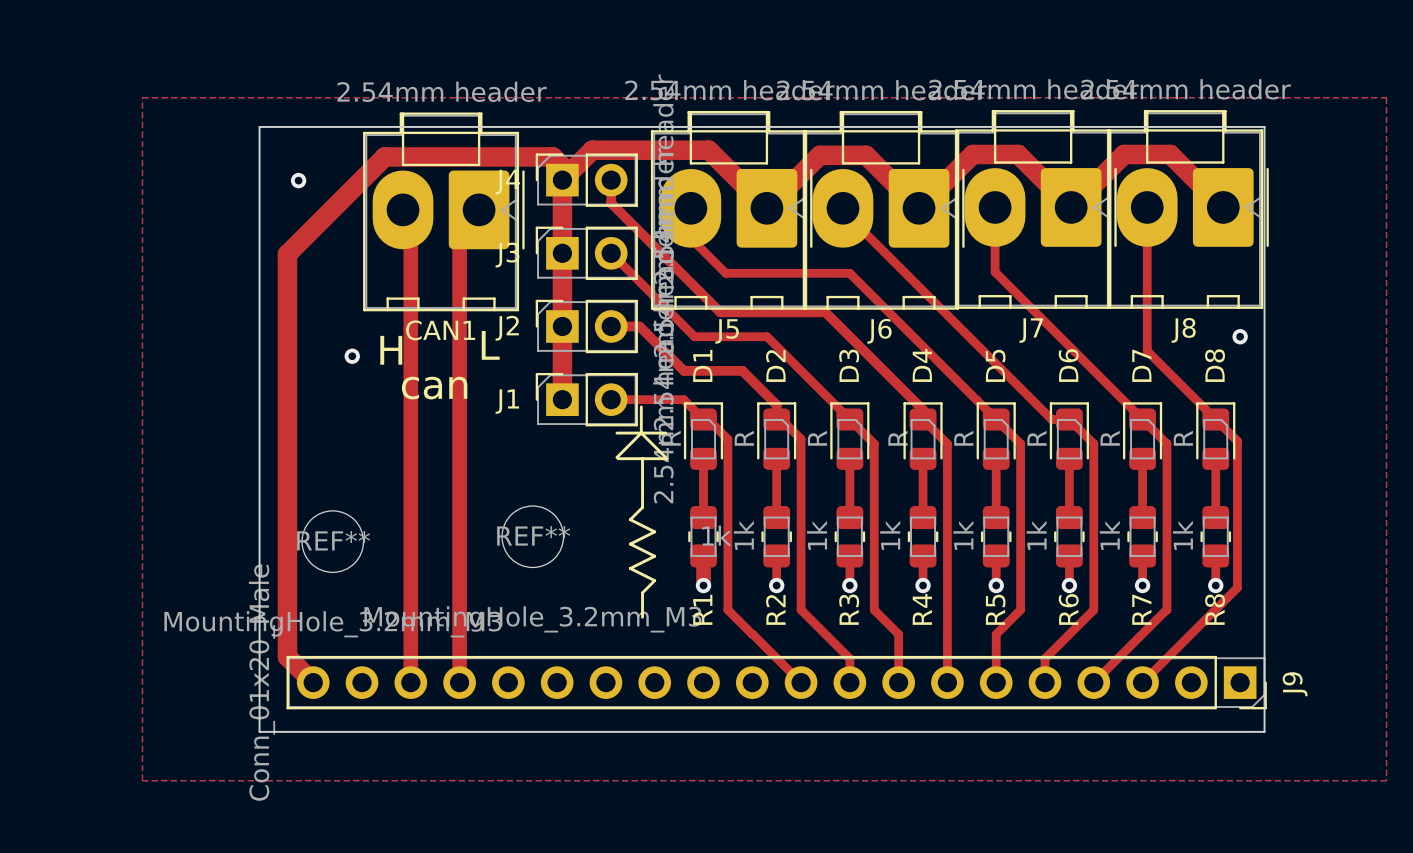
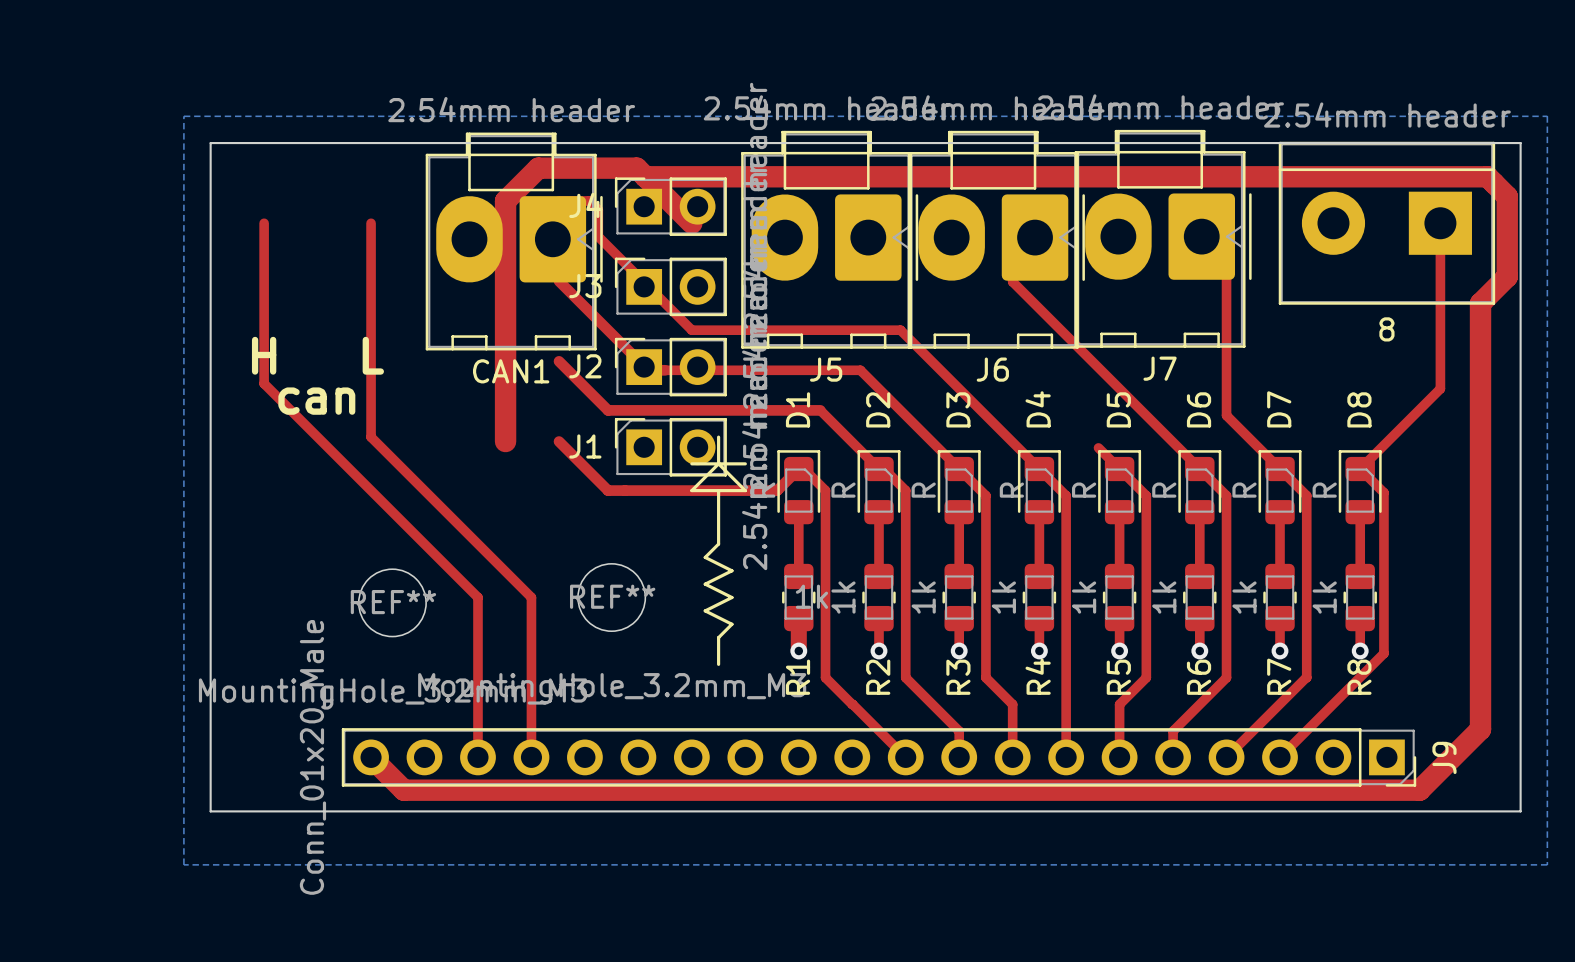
top zone outline: (142, 97) (142, 780) (1386, 780) (1386, 97) (142, 97) -> none
top track: (562, 165) (552, 156) (384, 156) (287, 254) (287, 656) (313, 682) -> (645, 176) (1487, 176) (1507, 196) (1507, 276) (1480, 303) (1480, 729) (1419, 790) (403, 790) (371, 757)
via: (298, 180) -> none
top track: (611, 180) (611, 203) (720, 312) (825, 312) (923, 409) (923, 419) -> (559, 200) (589, 200) (598, 209) (598, 236) (691, 330) (900, 330) (1039, 469)
top track: none -> (691, 223) (636, 168) (538, 168) (505, 200) (505, 441)
8: none -> 2.54mm header (1386, 223)
top track: (995, 207) (995, 272) (1093, 370) -> (1226, 223) (1226, 415)
top track: (1147, 207) (1147, 350) (1215, 419) -> (1440, 223) (1440, 388) (1360, 469)
top track: (1223, 207) (1170, 154) (1124, 154) (1071, 207) (1018, 154) (972, 154) (919, 208) (866, 155) (819, 155) (766, 208) (708, 150) (592, 150) (562, 180) (562, 399) -> none
top track: (690, 208) (690, 238) (725, 273) (849, 273) (976, 400) -> none
top track: (842, 208) (842, 210) (1051, 419) (1069, 419) -> (1012, 223) (1012, 281) (1199, 469)
top track: (403, 209) (410, 217) (410, 536) -> (264, 223) (264, 383) (477, 597)
top track: (479, 209) (459, 229) (459, 536) -> (371, 223) (371, 437) (531, 597)
J8: 2.54mm header (1188, 209) -> none
top track: (611, 253) (694, 336) (767, 336) -> (559, 281) (648, 370) (860, 370) (868, 378)
top track: (611, 326) (639, 326) (684, 370) (742, 370) (776, 405) (776, 419) -> (559, 361) (608, 410) (820, 410) (879, 469)
via: (1240, 336) -> none
text position: L (490, 345) -> L (373, 355)
text position: H (391, 350) -> H (264, 355)
via: (352, 356) -> none
text position: can (434, 388) -> can (316, 401)
top track: (611, 399) (683, 399) (703, 419) -> (559, 441) (608, 490) (777, 490) (798, 469)
line: (641, 406) (641, 431) -> (718, 437) (718, 463)
line: none -> (718, 463) (745, 490) (691, 490) (718, 463)
line: (616, 433) (665, 433) -> (691, 463) (745, 463)
line: (616, 457) (641, 433) (665, 457) -> none
line: (618, 458) (666, 458) -> none
line: (642, 458) (642, 507) (630, 519) (654, 531) (630, 544) (654, 556) (630, 568) (654, 580) (642, 592) (642, 617) -> (718, 490) (718, 544) (705, 557) (731, 570) (705, 584) (731, 597) (705, 610) (731, 624) (718, 637) (718, 664)
top track width: thick (410, 536) (410, 682) -> thin (477, 597) (477, 757)
top track width: thick (459, 536) (459, 682) -> thin (531, 597) (531, 757)
board edge: (259, 731) (259, 126) (1264, 126) (1264, 731) -> (312, 811) (210, 811) (210, 143) (1520, 143) (1520, 811) (1413, 811)

